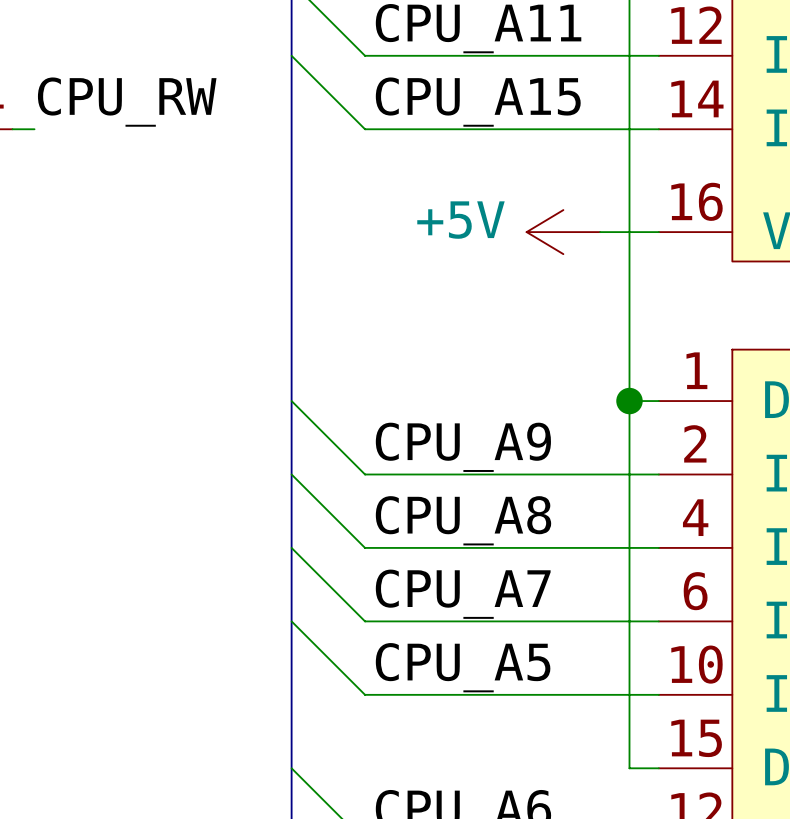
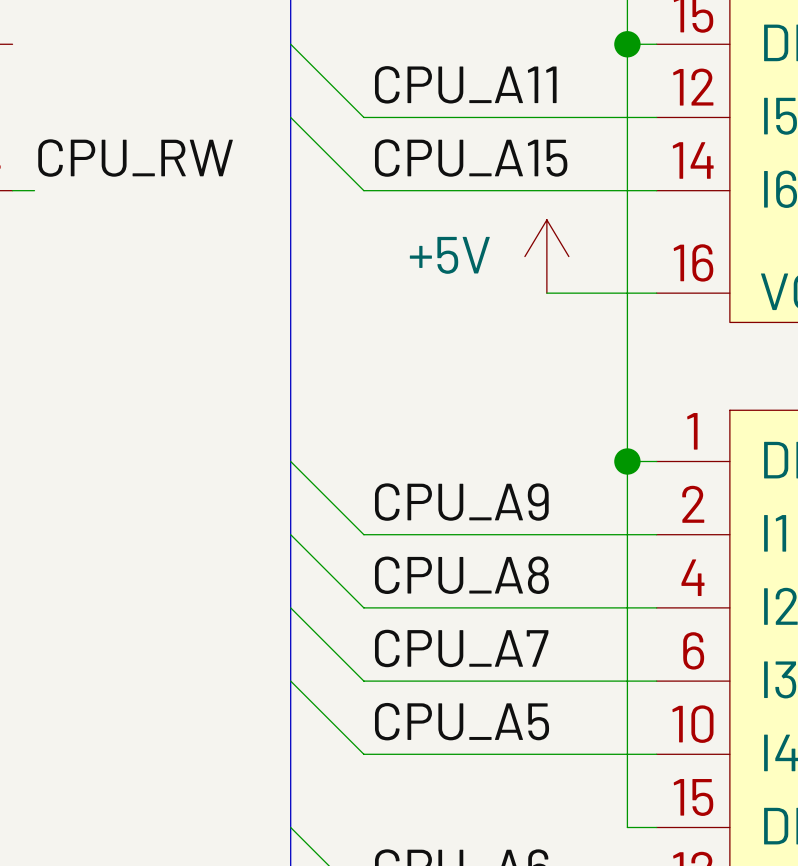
power symbol rotation: 0° (563, 232) -> 90° clockwise (546, 256)

